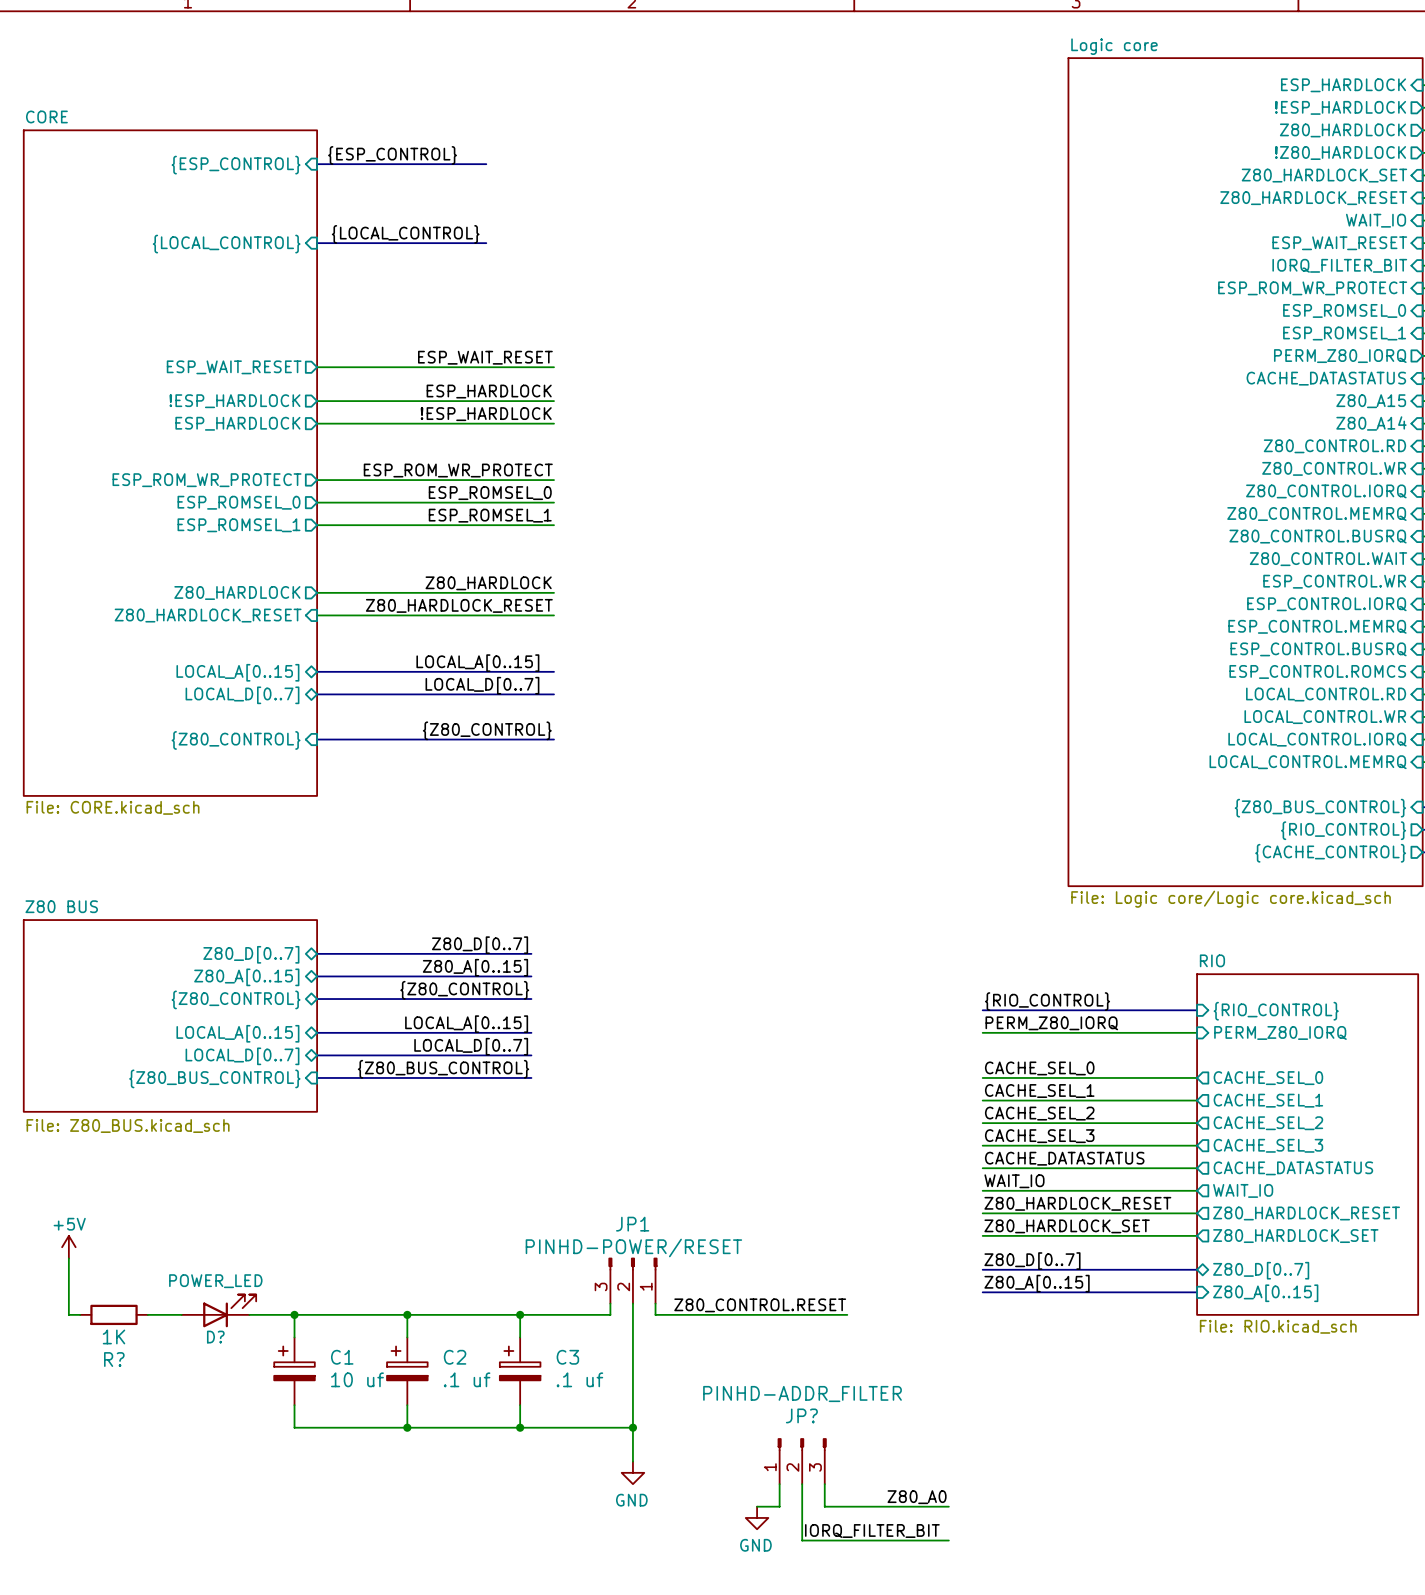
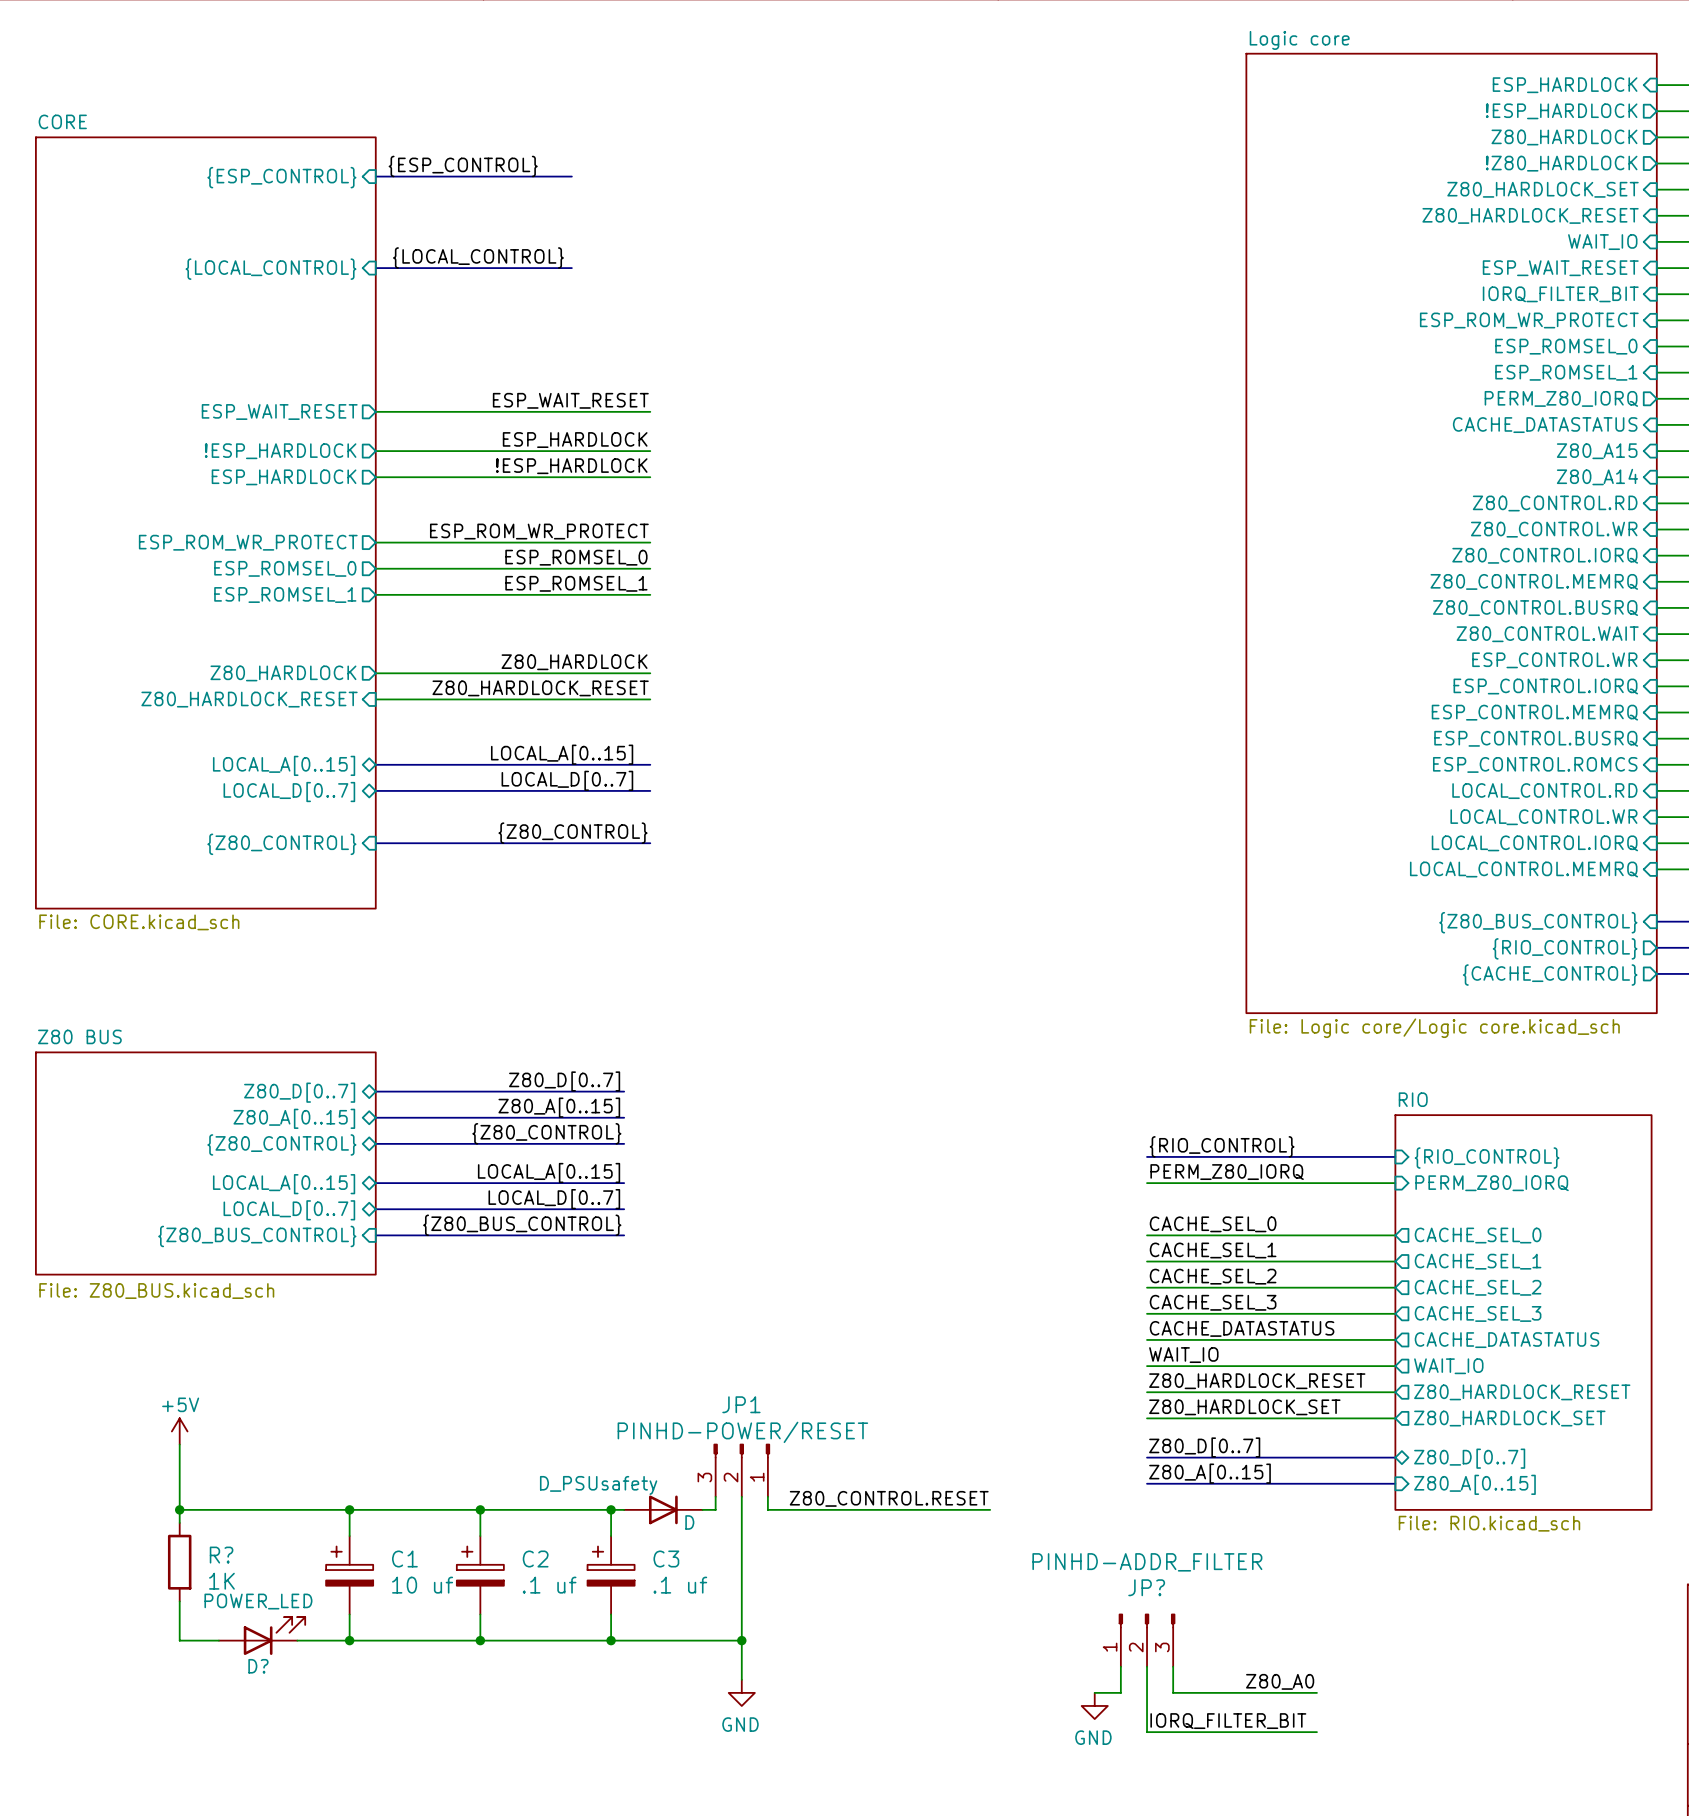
power symbol position: +5V (68, 1247) -> +5V (179, 1431)
wire: (68, 1258) (68, 1314) (80, 1314) -> none
wire: none -> (179, 1444) (179, 1522)
D? position: (218, 1310) -> (262, 1636)
R? rotation: 0° (114, 1314) -> 90° clockwise (179, 1562)
R? position: (114, 1314) -> (179, 1562)
junction: none -> (179, 1509)
D_PSUsafety: none -> D (663, 1509)
R? value position: 1K (114, 1336) -> 1K (221, 1581)
R? name position: R? (114, 1359) -> R? (221, 1555)
wire: none -> (179, 1601) (179, 1640) (218, 1640)
wire: none -> (297, 1640) (349, 1640)
junction: none -> (349, 1640)
JP? position: (802, 1461) -> (1147, 1640)
wire: (779, 1484) (779, 1506) (757, 1506) -> (1120, 1666) (1120, 1692) (1094, 1692)
wire: (802, 1484) (802, 1540) (948, 1540) -> (1147, 1666) (1147, 1732) (1316, 1732)
wire: (824, 1484) (824, 1506) (948, 1506) -> (1173, 1666) (1173, 1692) (1316, 1692)
label position: Z80_A0 (917, 1497) -> Z80_A0 (1280, 1681)
power symbol position: GND (757, 1517) -> GND (1094, 1705)
label position: IORQ_FILTER_BIT (872, 1531) -> IORQ_FILTER_BIT (1228, 1721)

